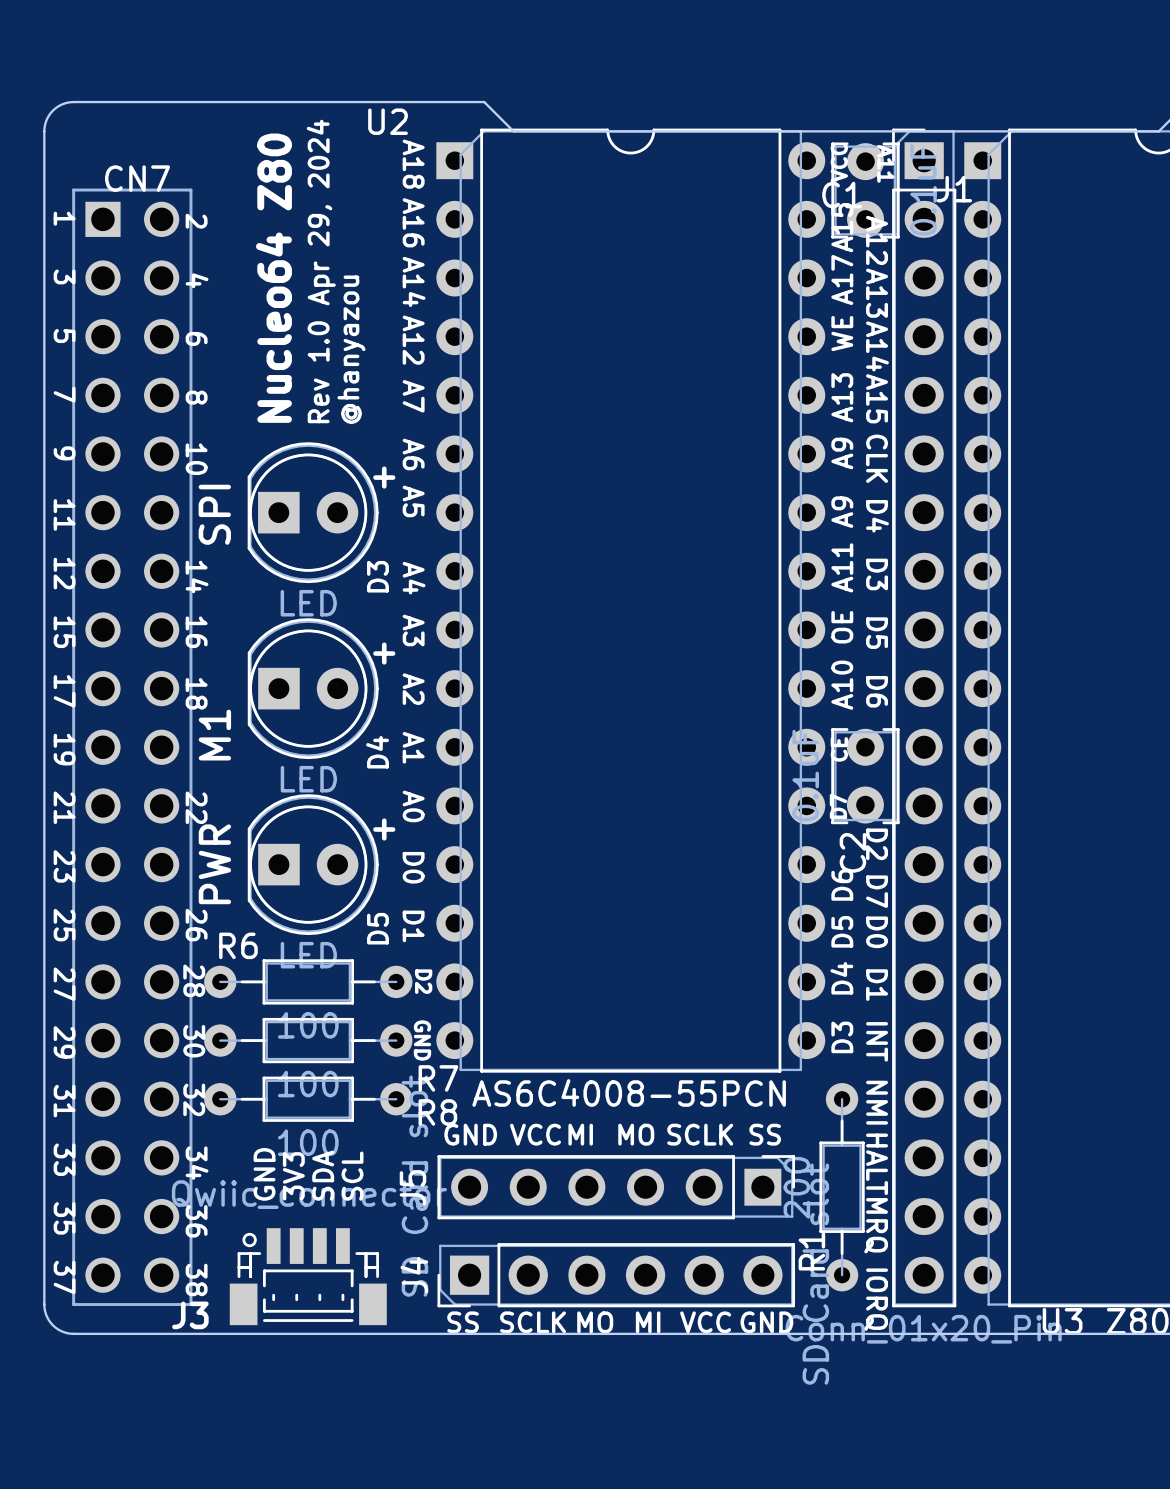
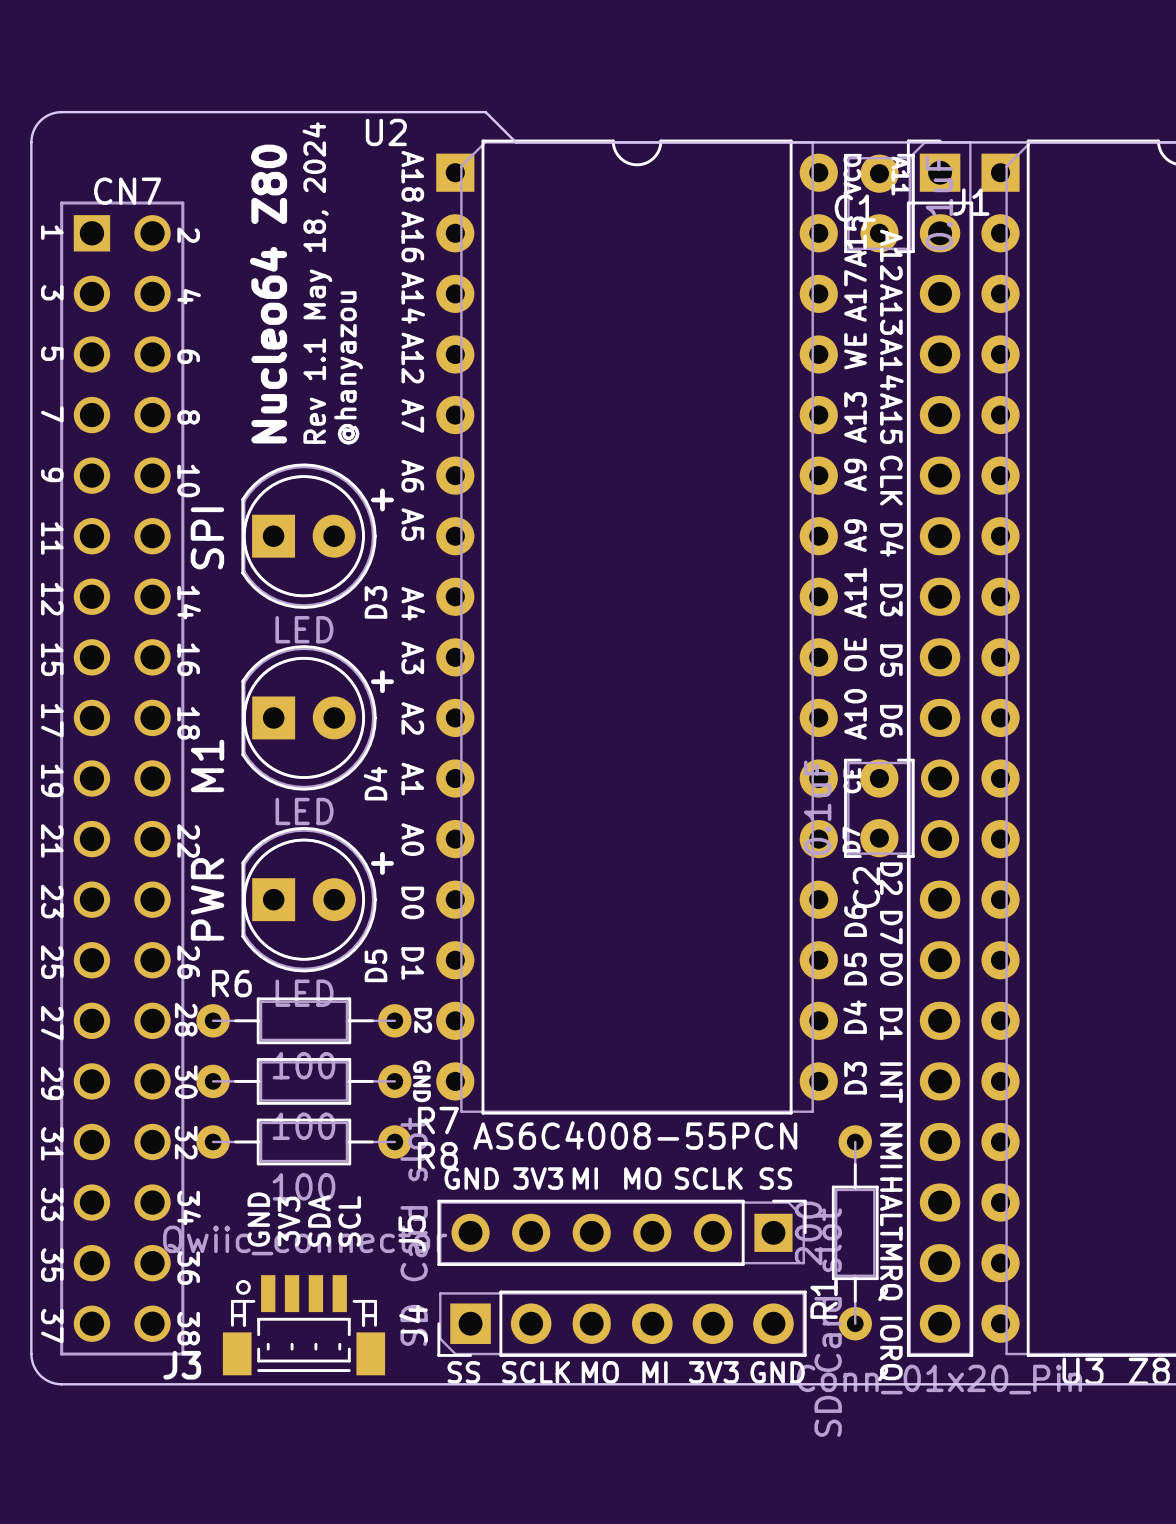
text: Rev 1.0 Apr 29, 2024 (321, 271) -> Rev 1.1 May 18, 2024 (317, 283)
text: VCC (535, 1134) -> 3V3 (538, 1178)
text: VCC (705, 1322) -> 3V3 (713, 1372)

